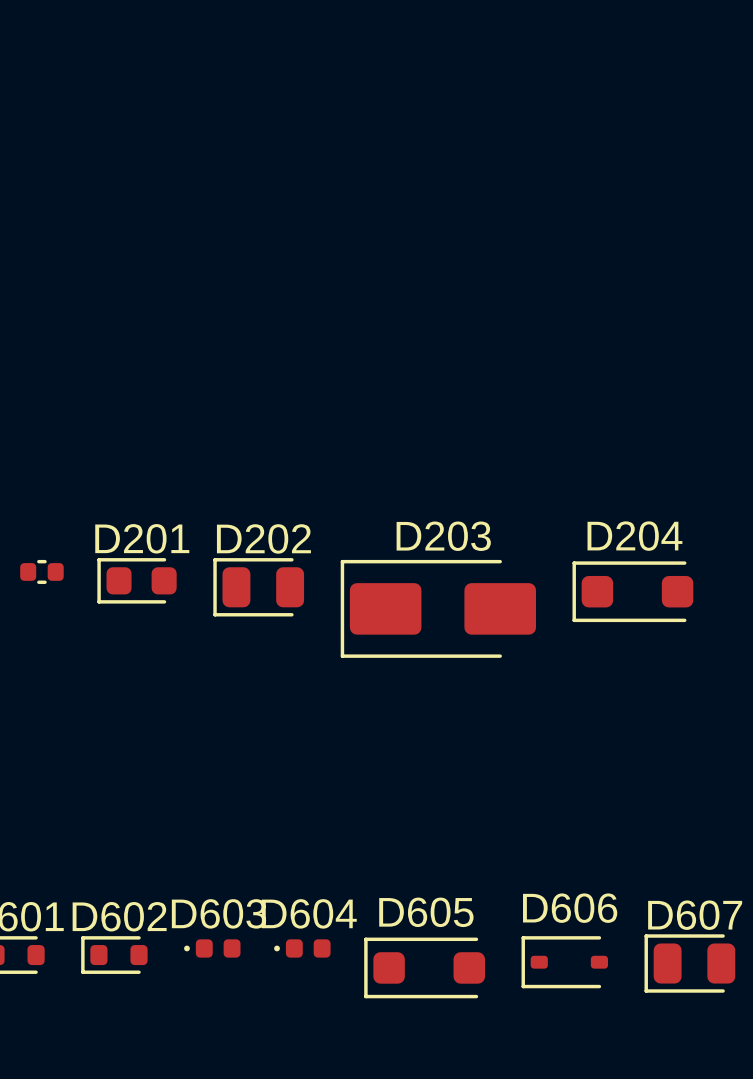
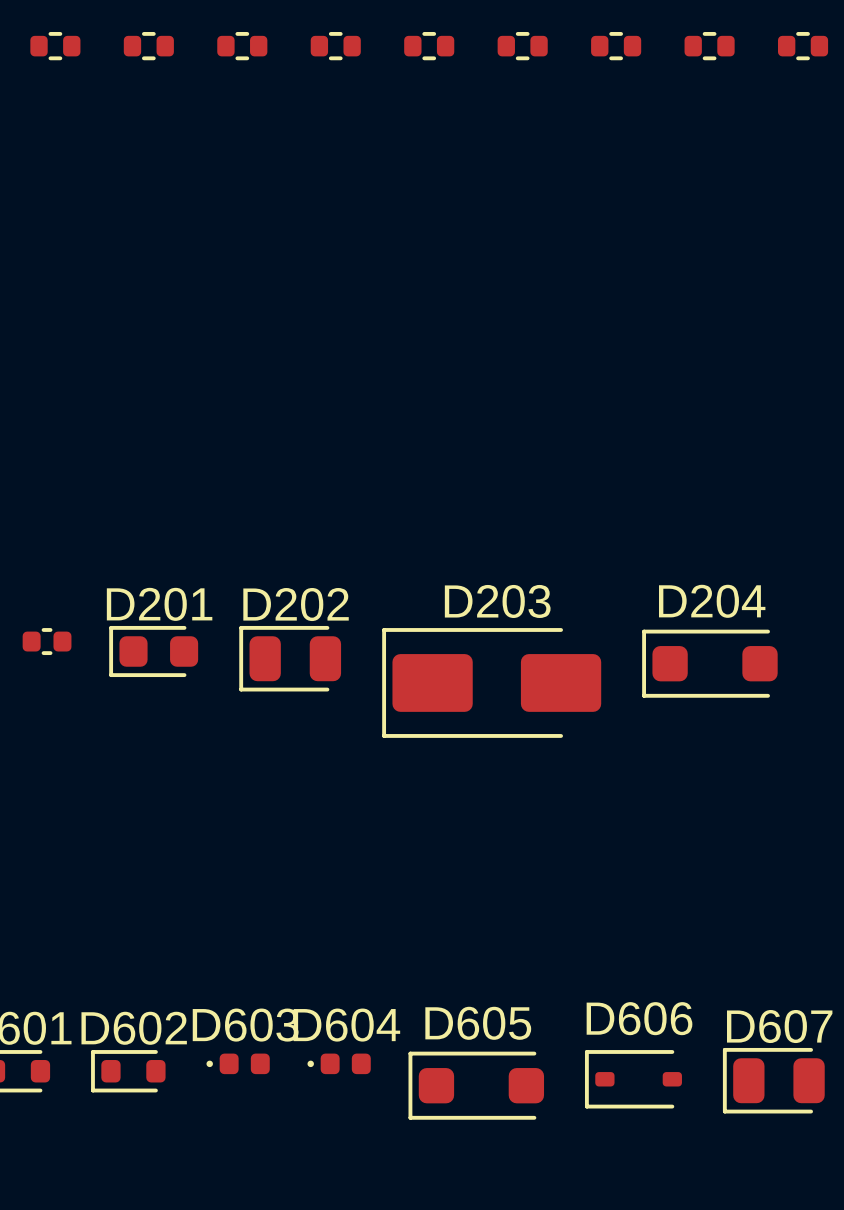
part: none -> (55, 46)
part: none -> (148, 46)
part: none -> (242, 46)
part: none -> (335, 46)
part: none -> (429, 46)
part: none -> (522, 46)
part: none -> (616, 46)
part: none -> (709, 46)
part: none -> (803, 46)

